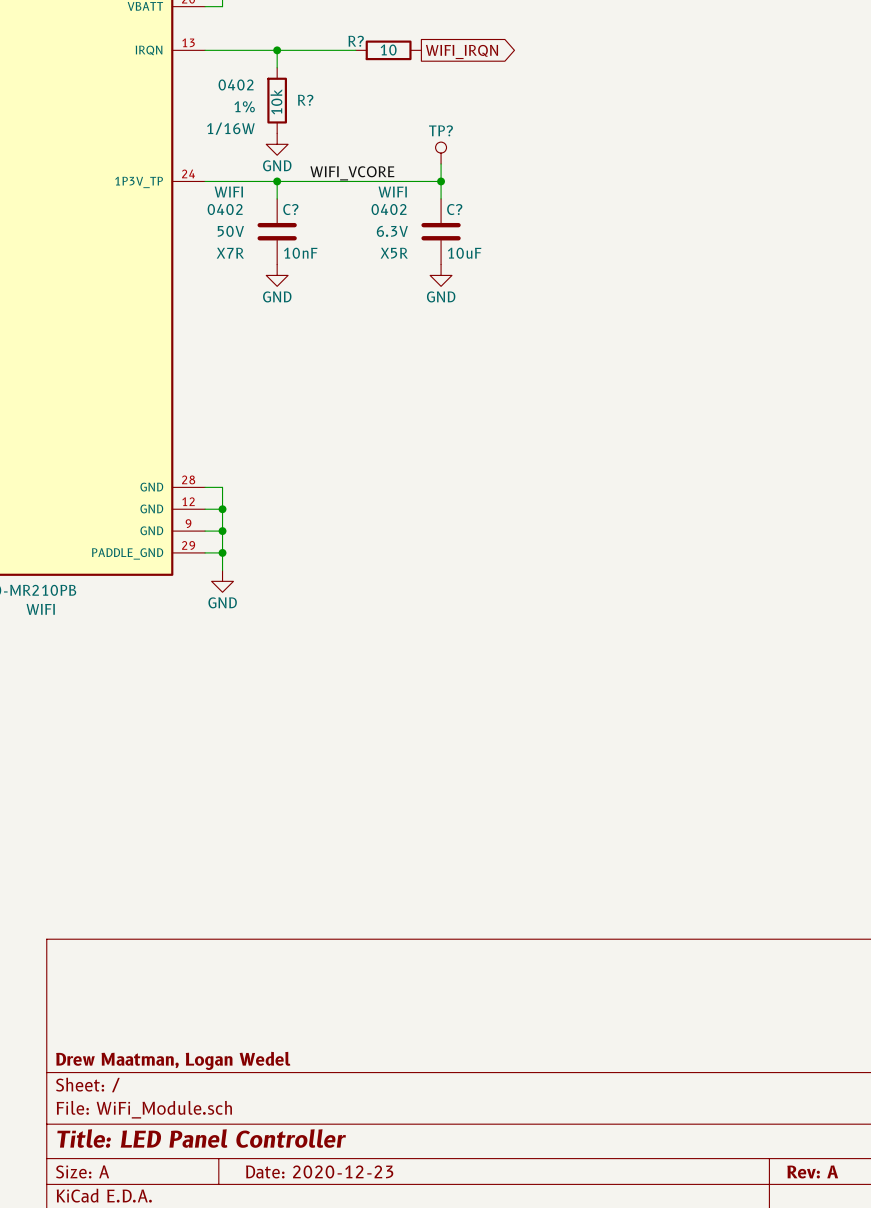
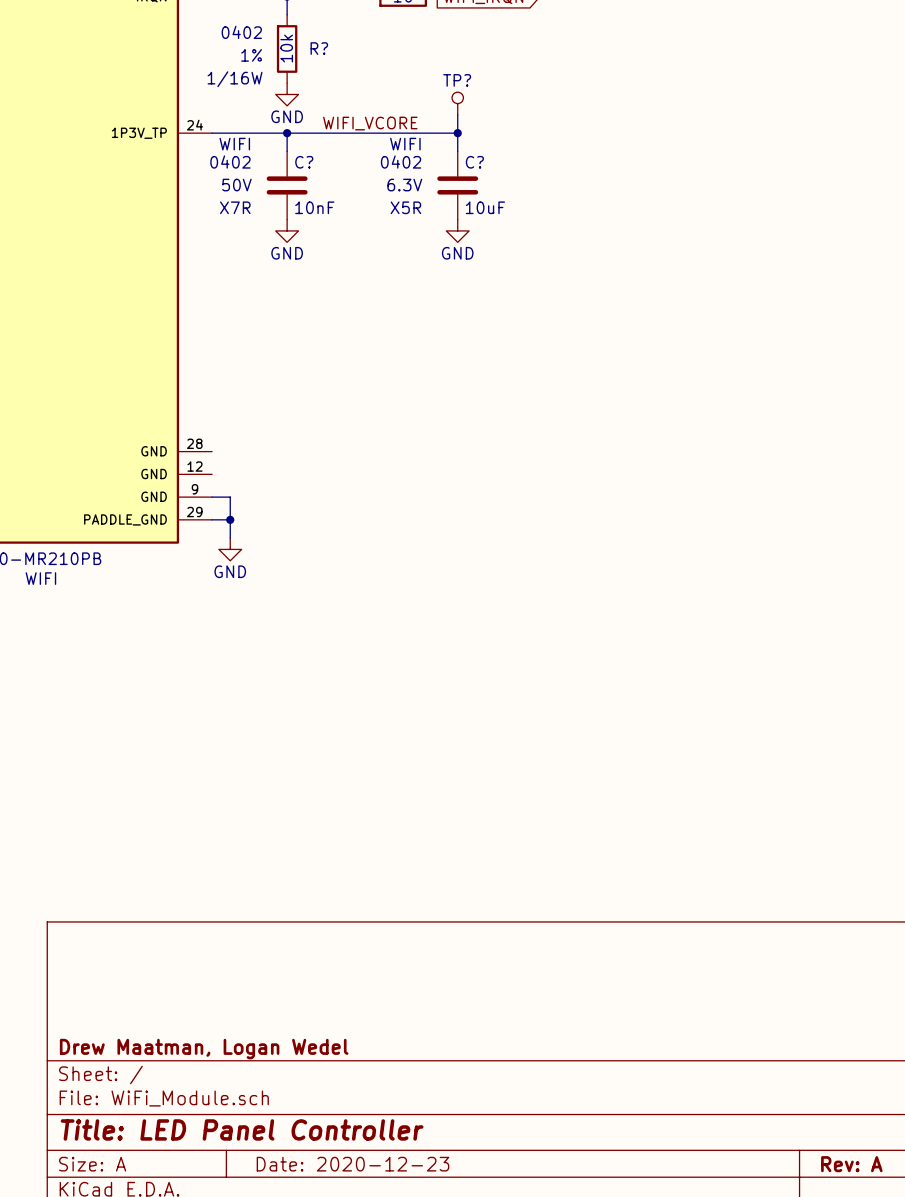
wire: (205, 487) (222, 487) (222, 531) -> none
wire: (205, 509) (222, 509) -> none
junction: (222, 509) -> none
junction: (222, 531) -> none

